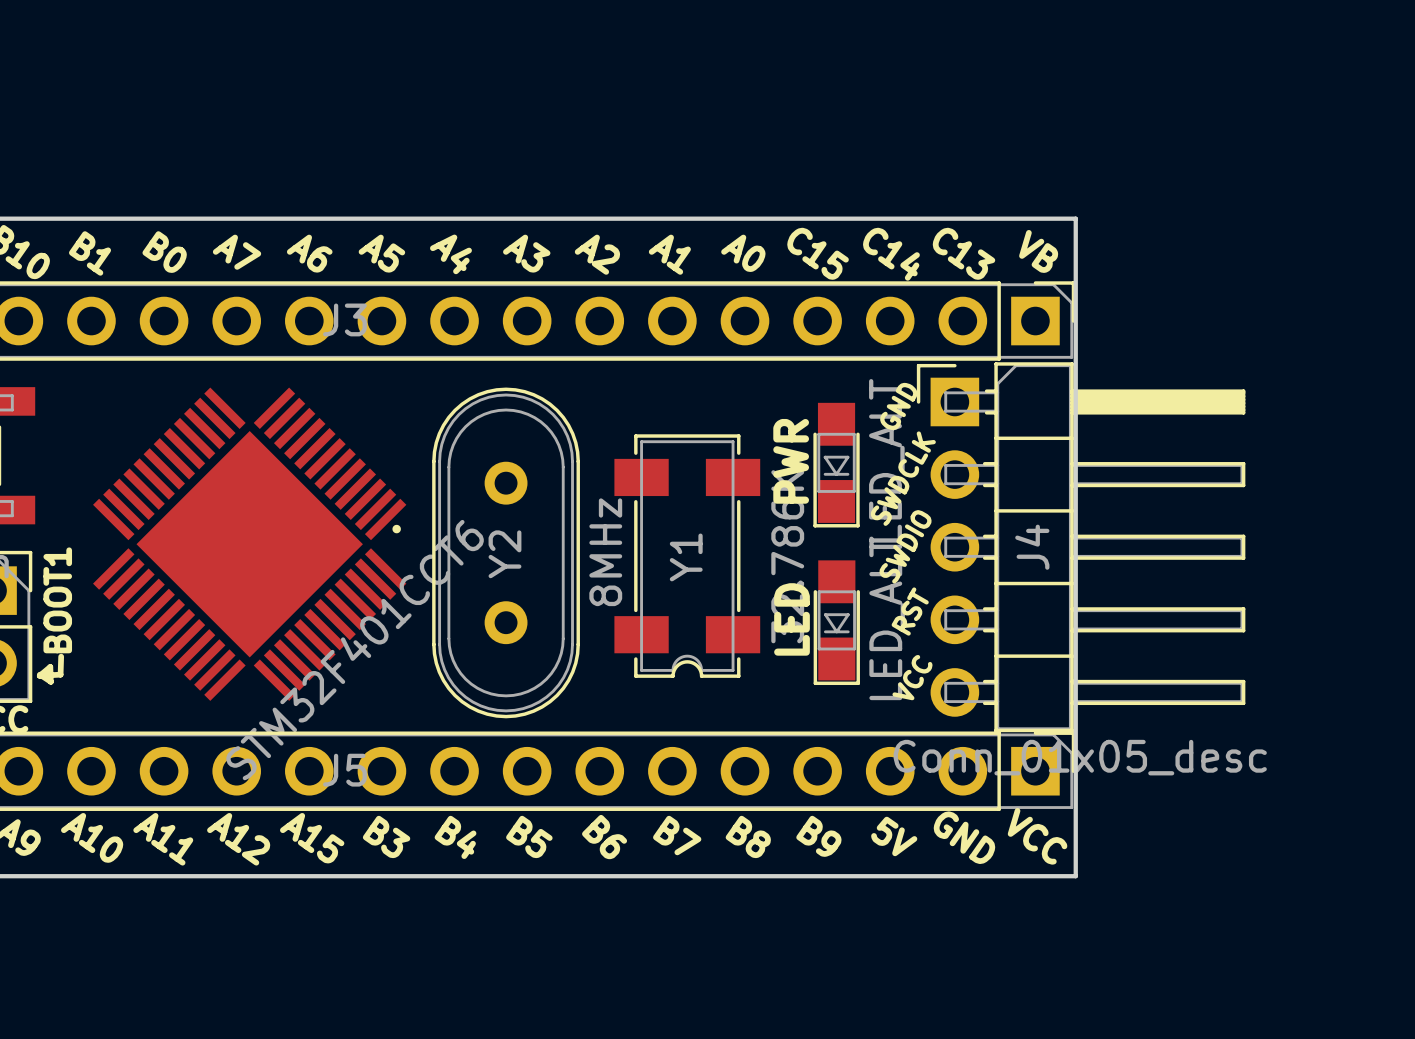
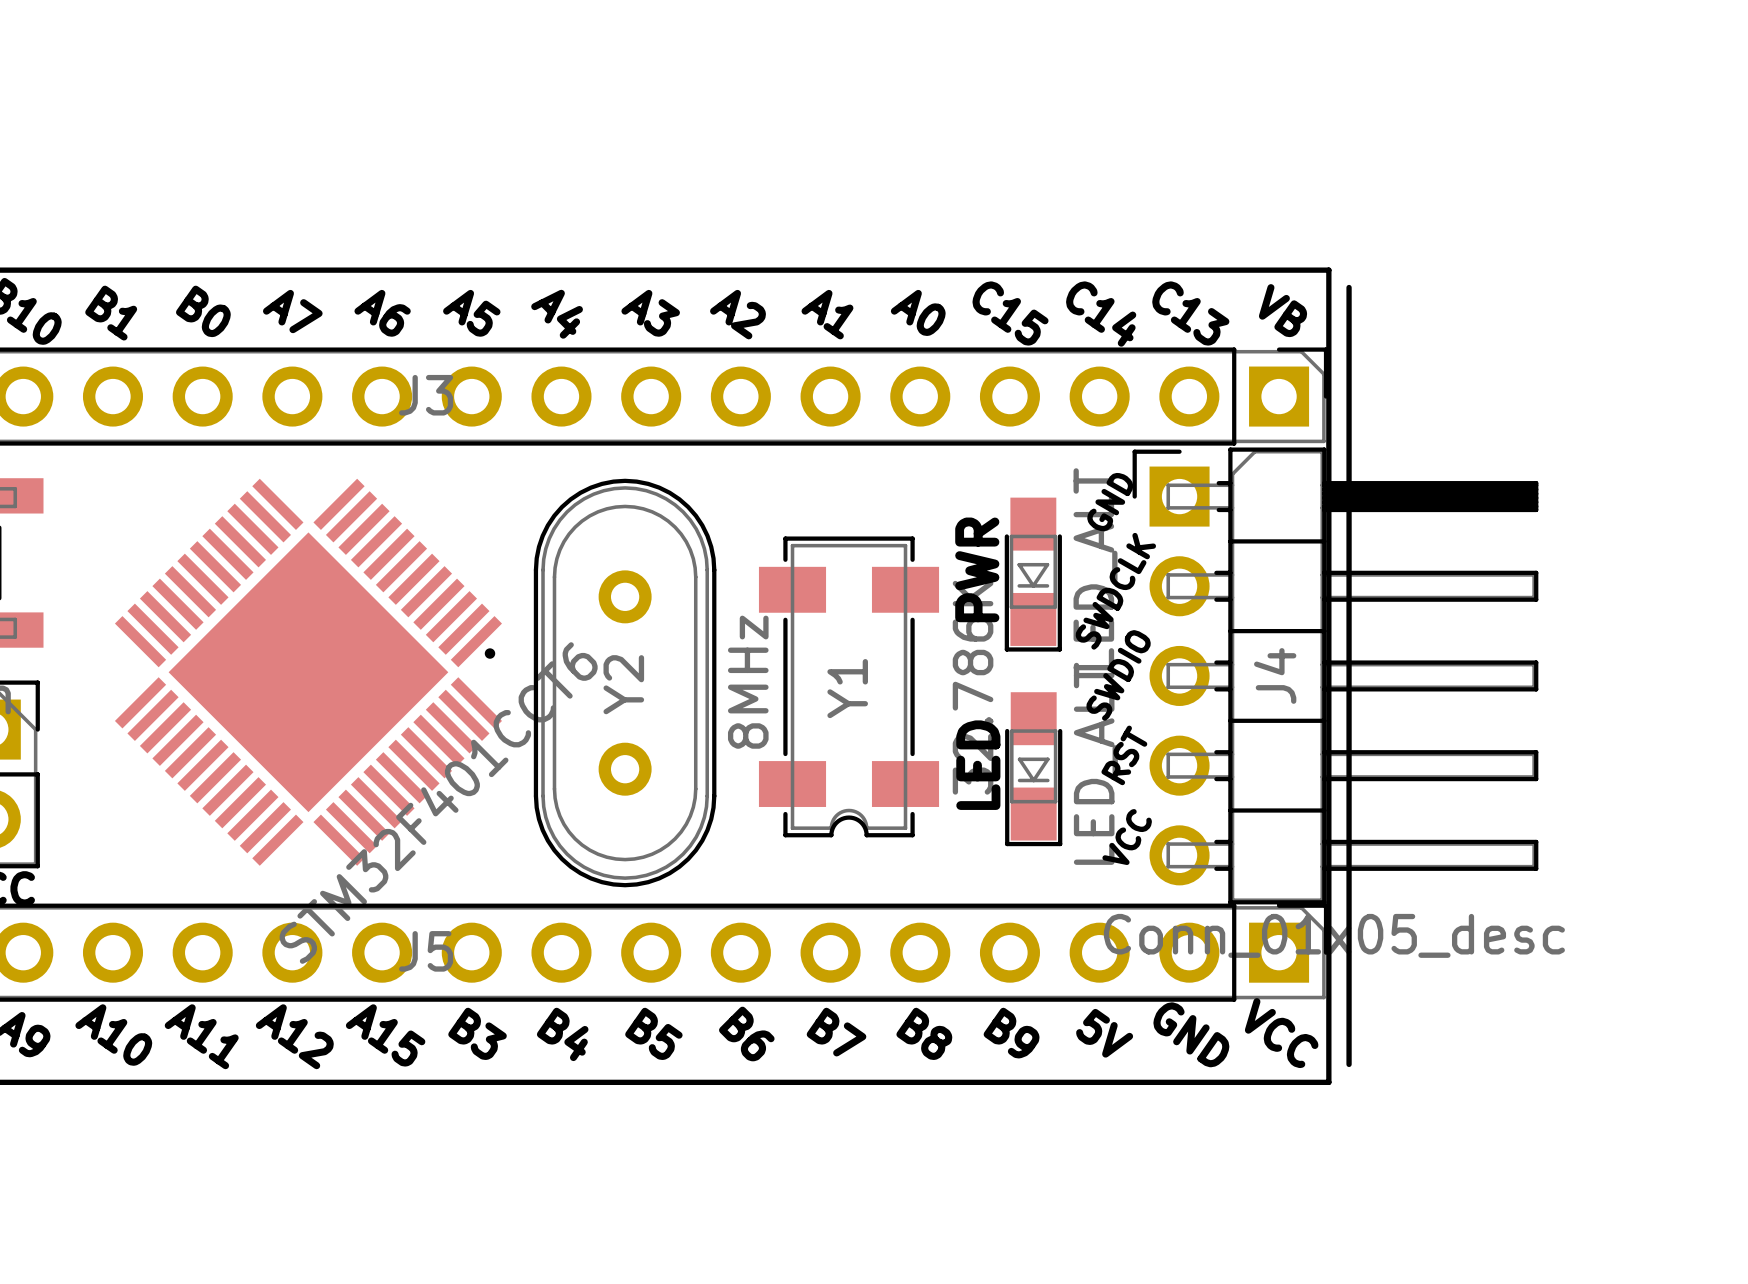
board edge: none -> (1349, 287) (1349, 1064)
text: BOOT1 (57, 600) -> none
line: (61, 656) (60, 674) (39, 675) (50, 666) (50, 681) (40, 674) -> none

